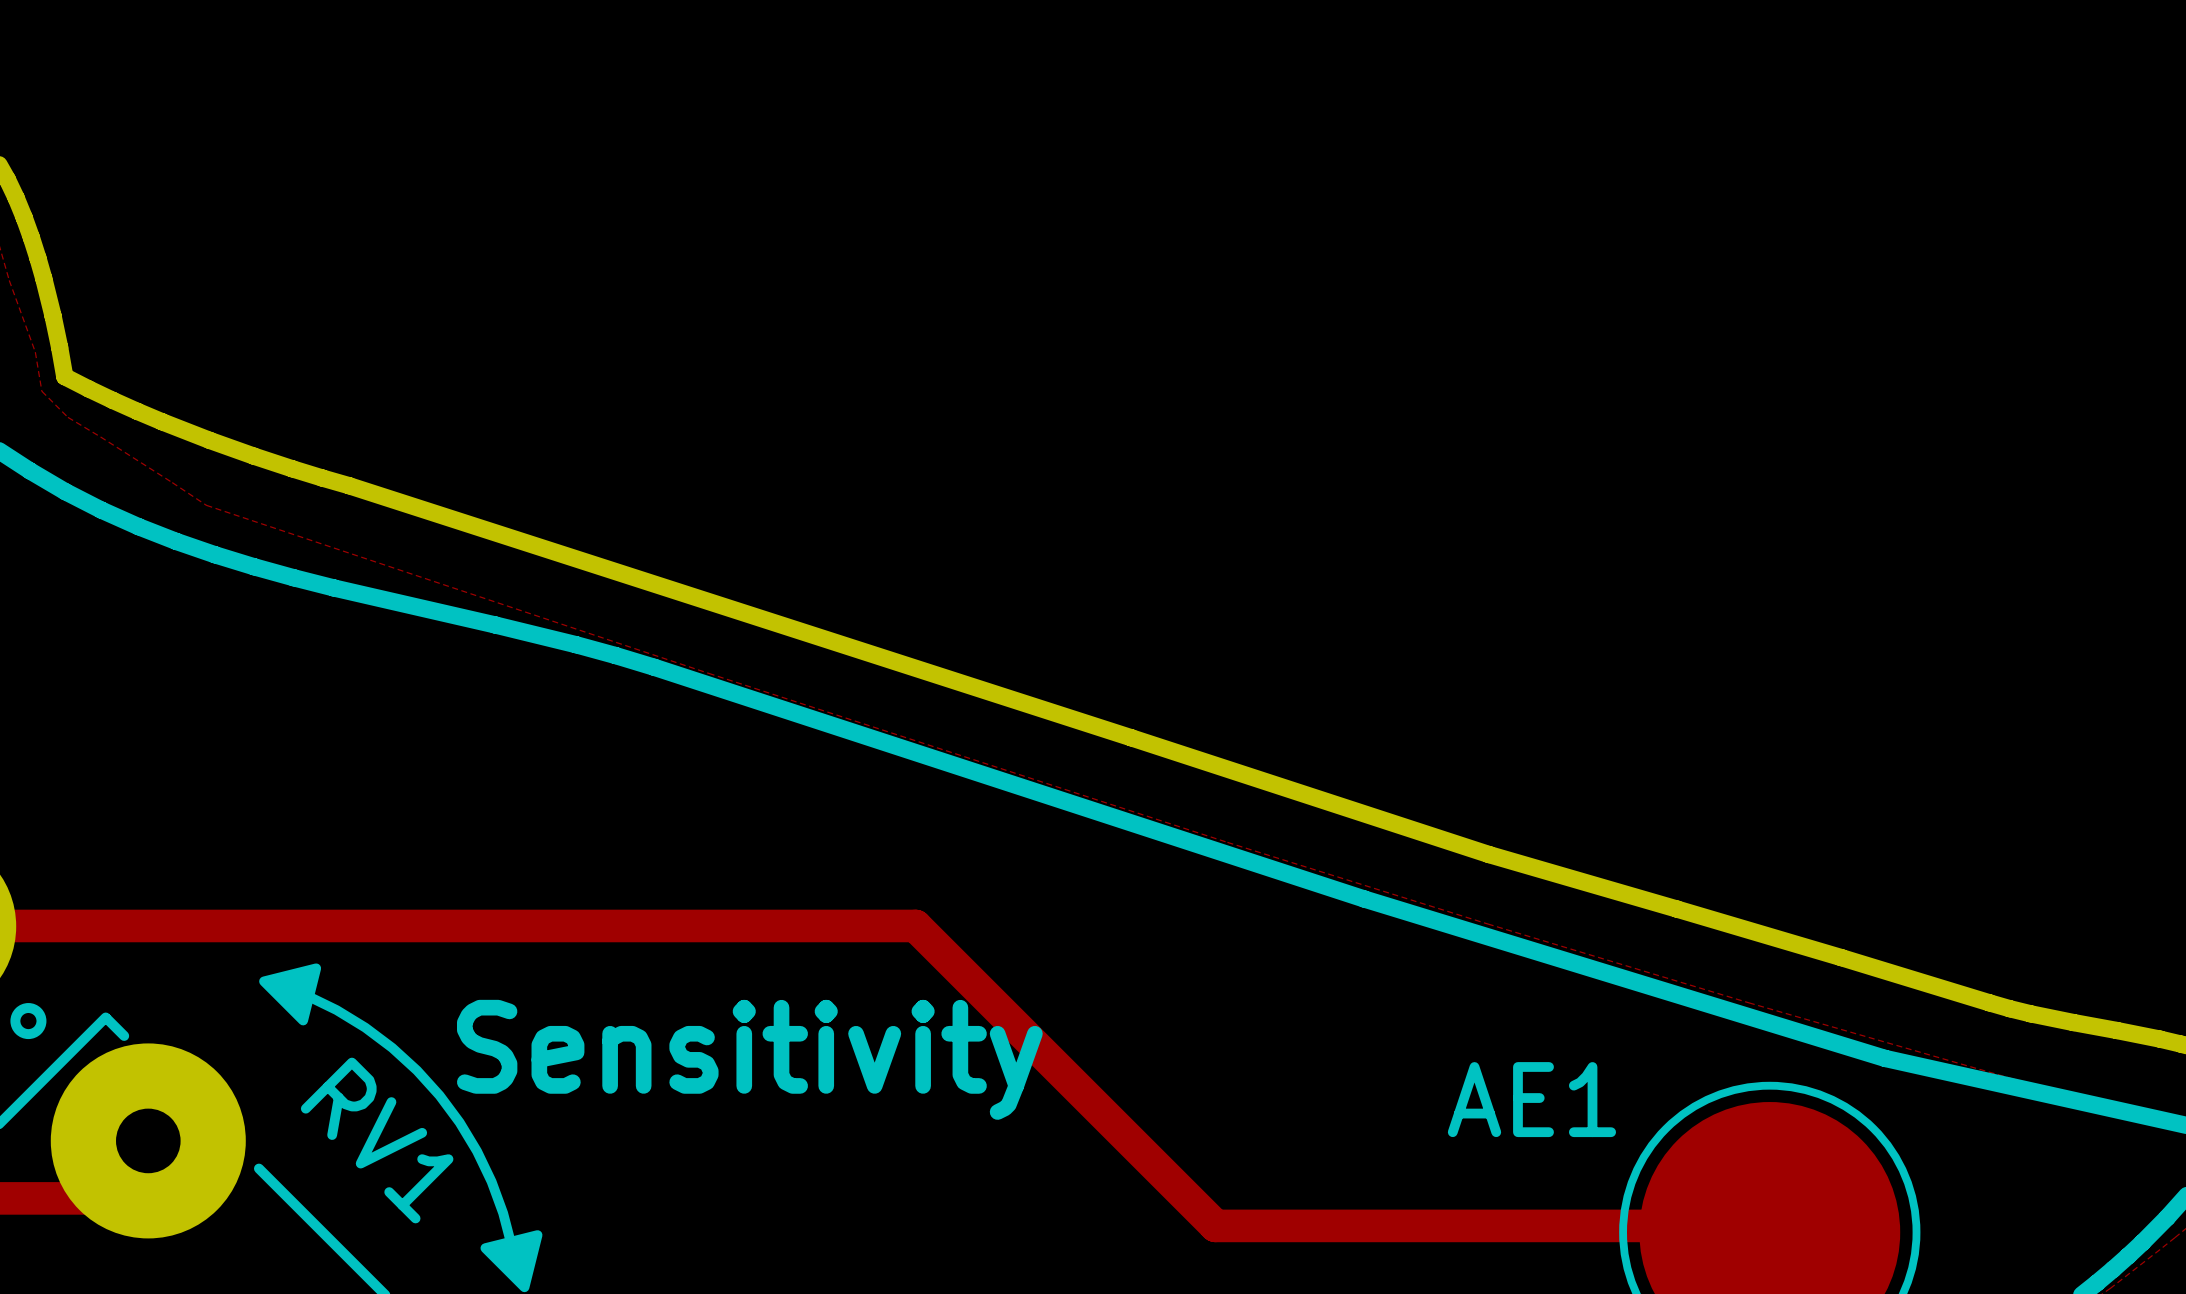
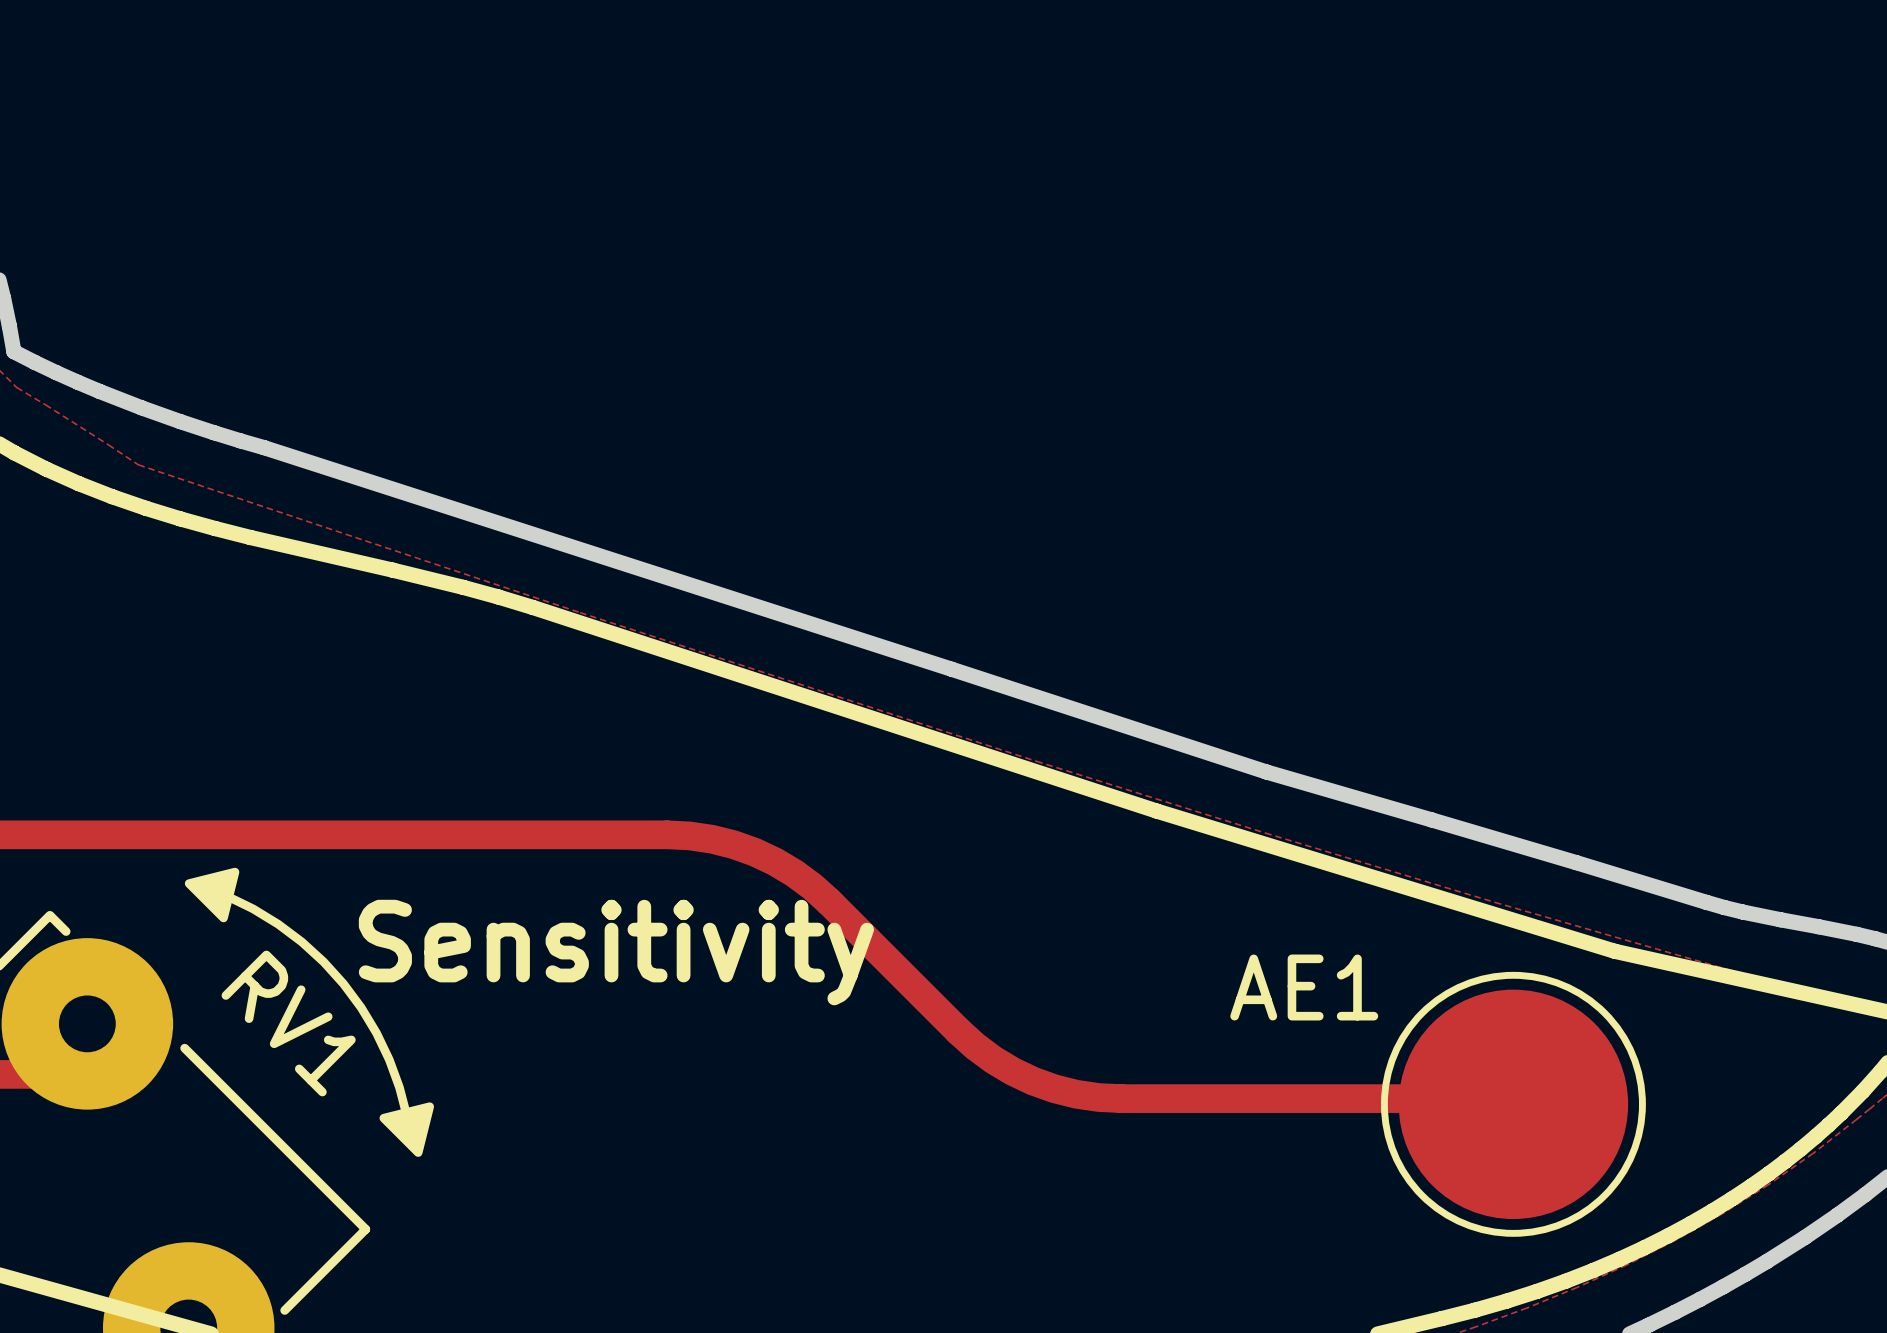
track: (807, 925) (915, 925) (992, 1002) -> (667, 834) (711, 839) (754, 852) (794, 873) (829, 902)
track: (1139, 1149) (1215, 1225) (1323, 1225) -> (958, 1031) (993, 1059) (1033, 1081) (1076, 1094) (1121, 1098)

